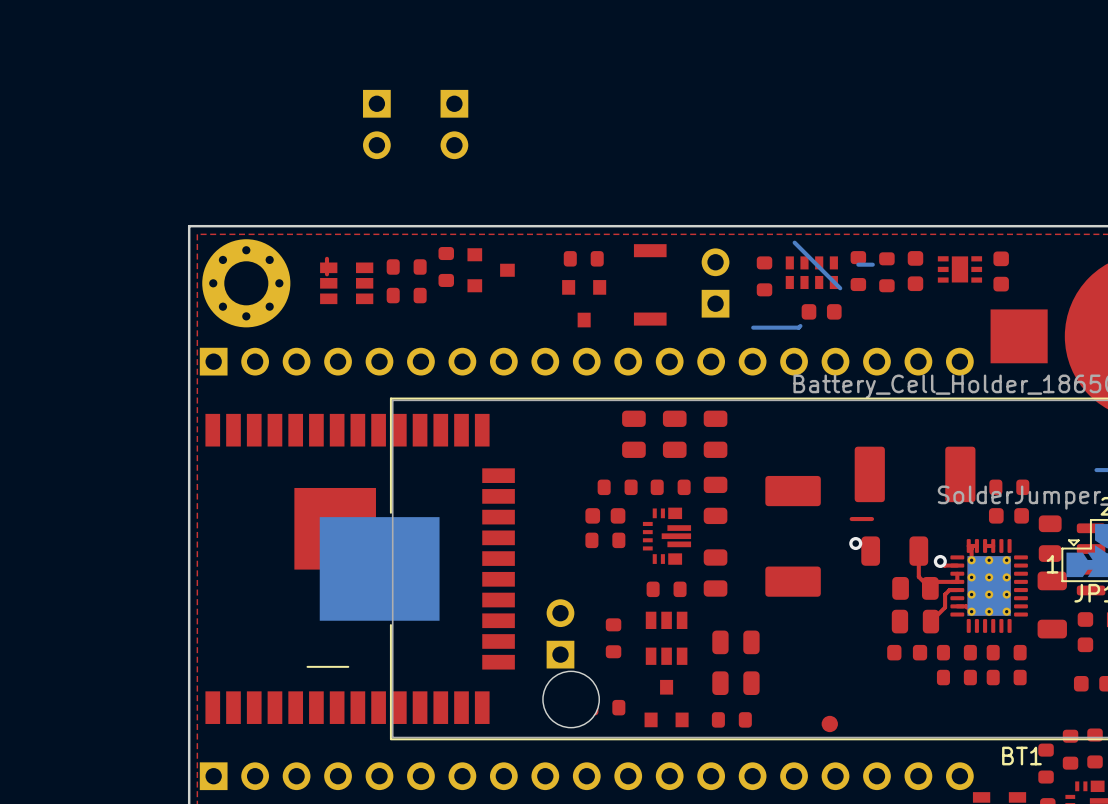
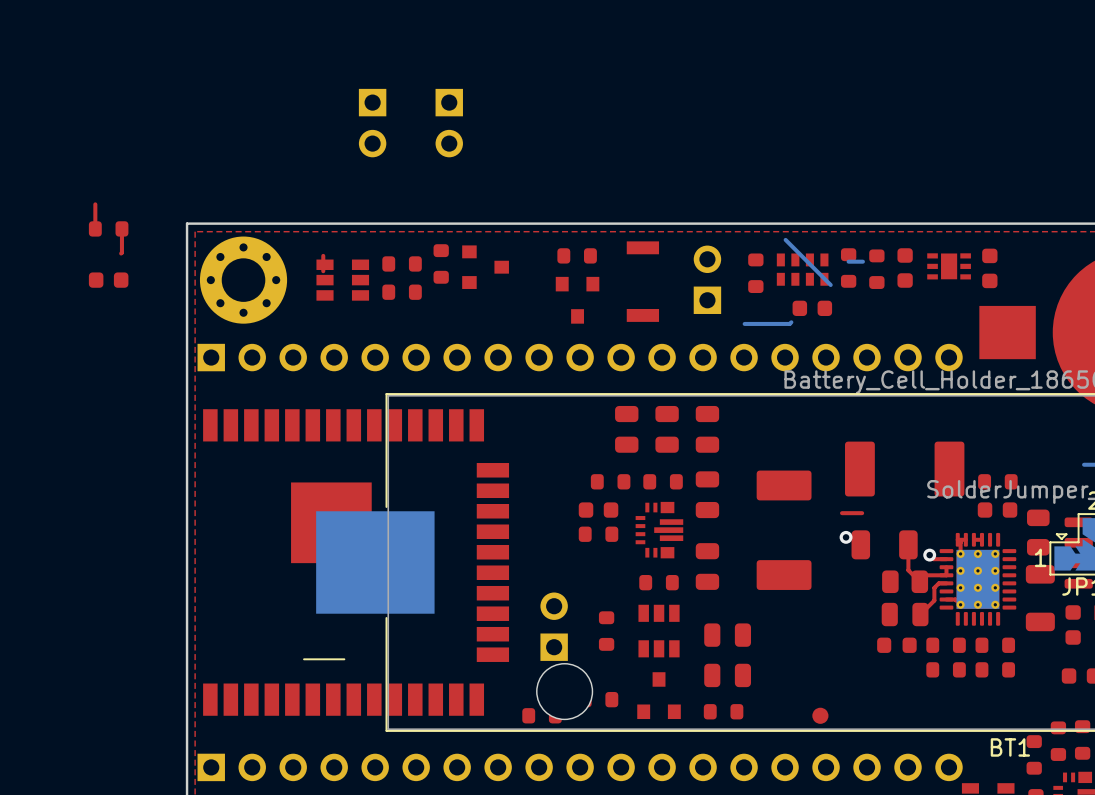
top track: none -> (95, 204) (95, 228)
part: none -> (108, 228)
top track: none -> (121, 228) (121, 253)
part: none -> (108, 280)
part: none -> (542, 715)

